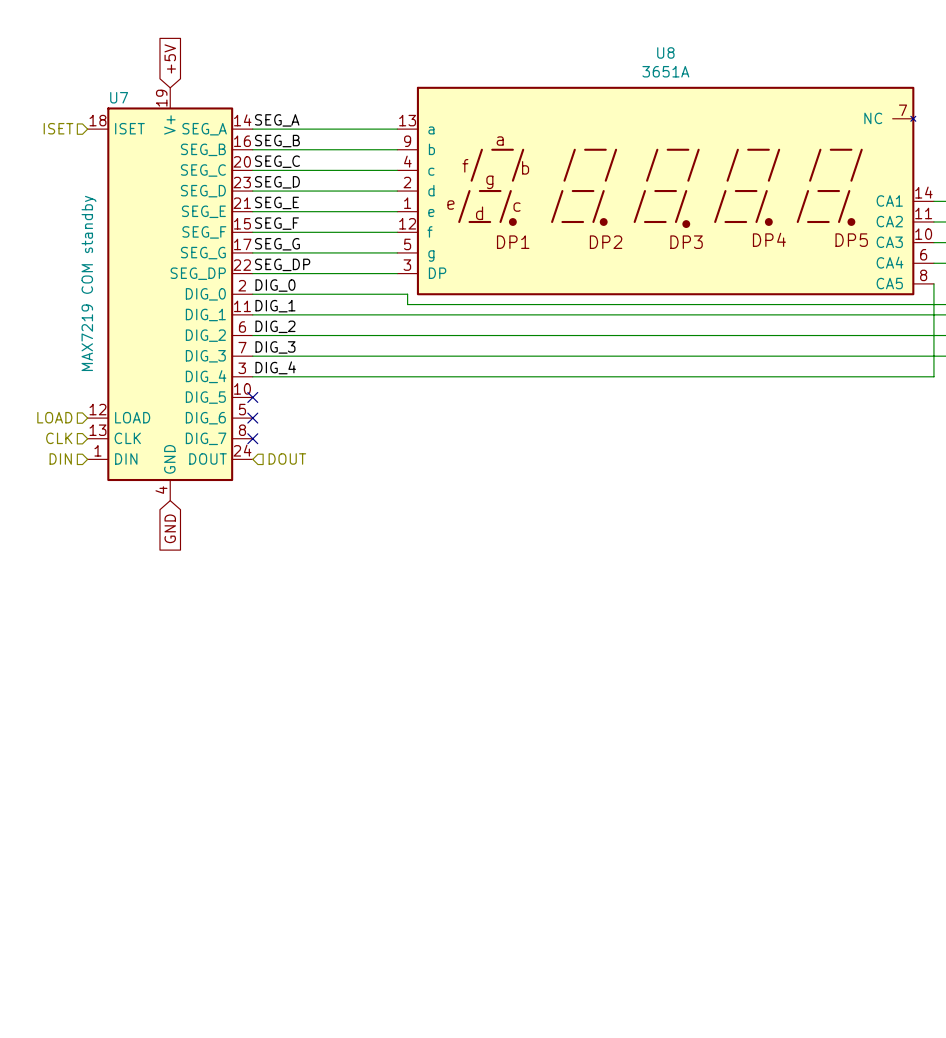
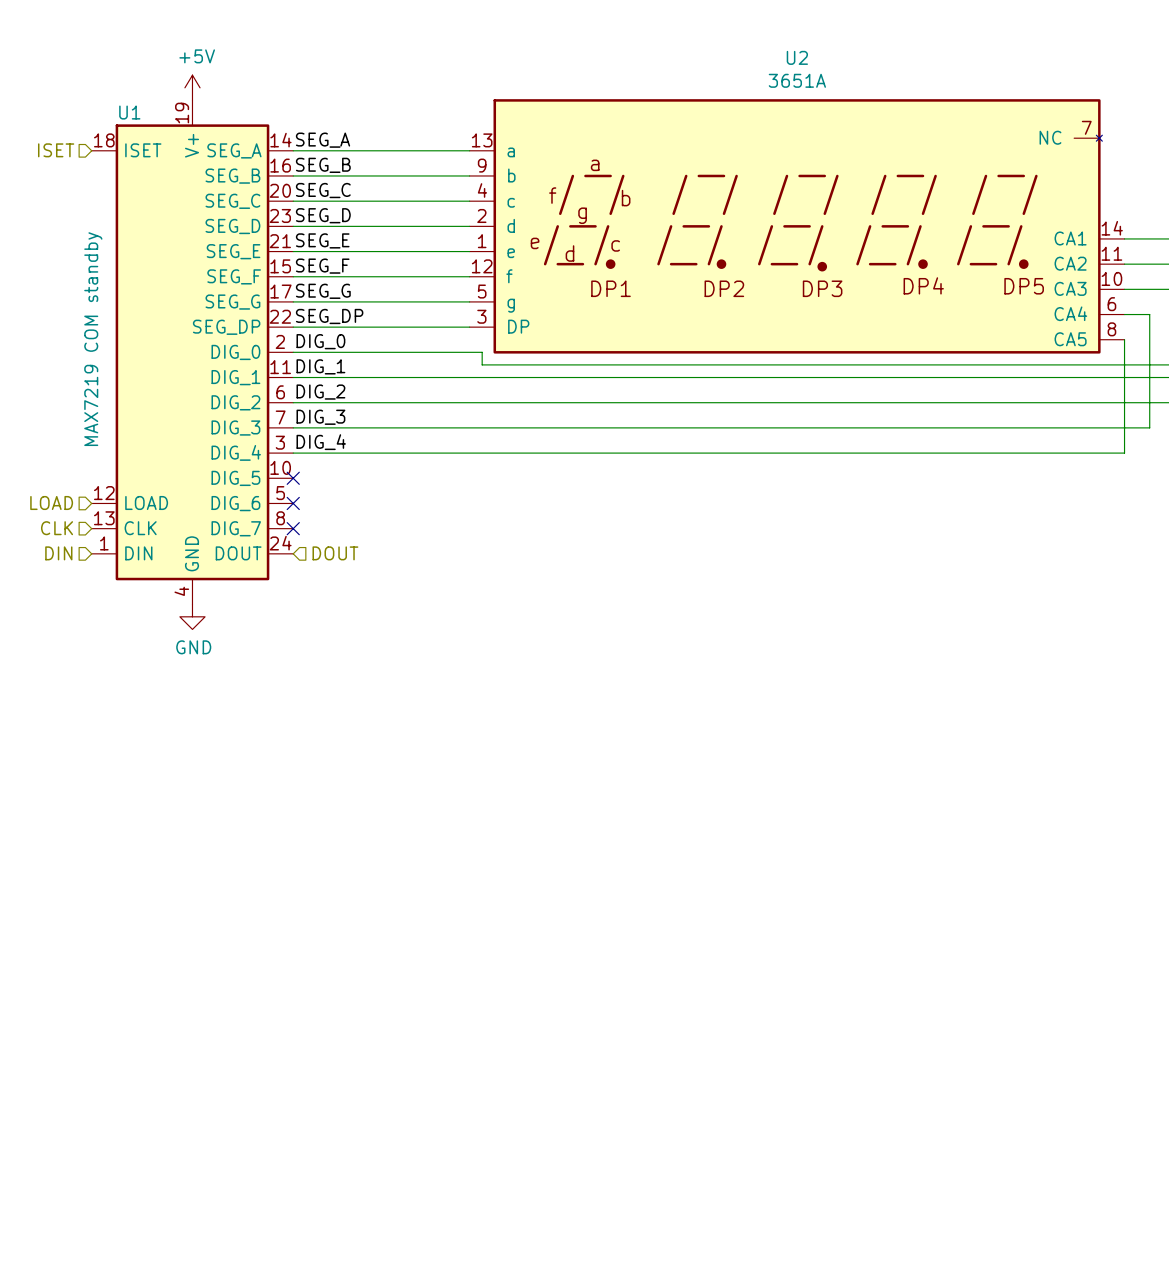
U8 name: U8 (665, 52) -> U2 (797, 57)
global label: +5V (170, 58) -> none
power symbol: none -> +5V (192, 87)
U7 name: U7 (119, 97) -> U1 (129, 112)
power symbol: none -> GND (192, 616)
global label: GND (170, 528) -> none

